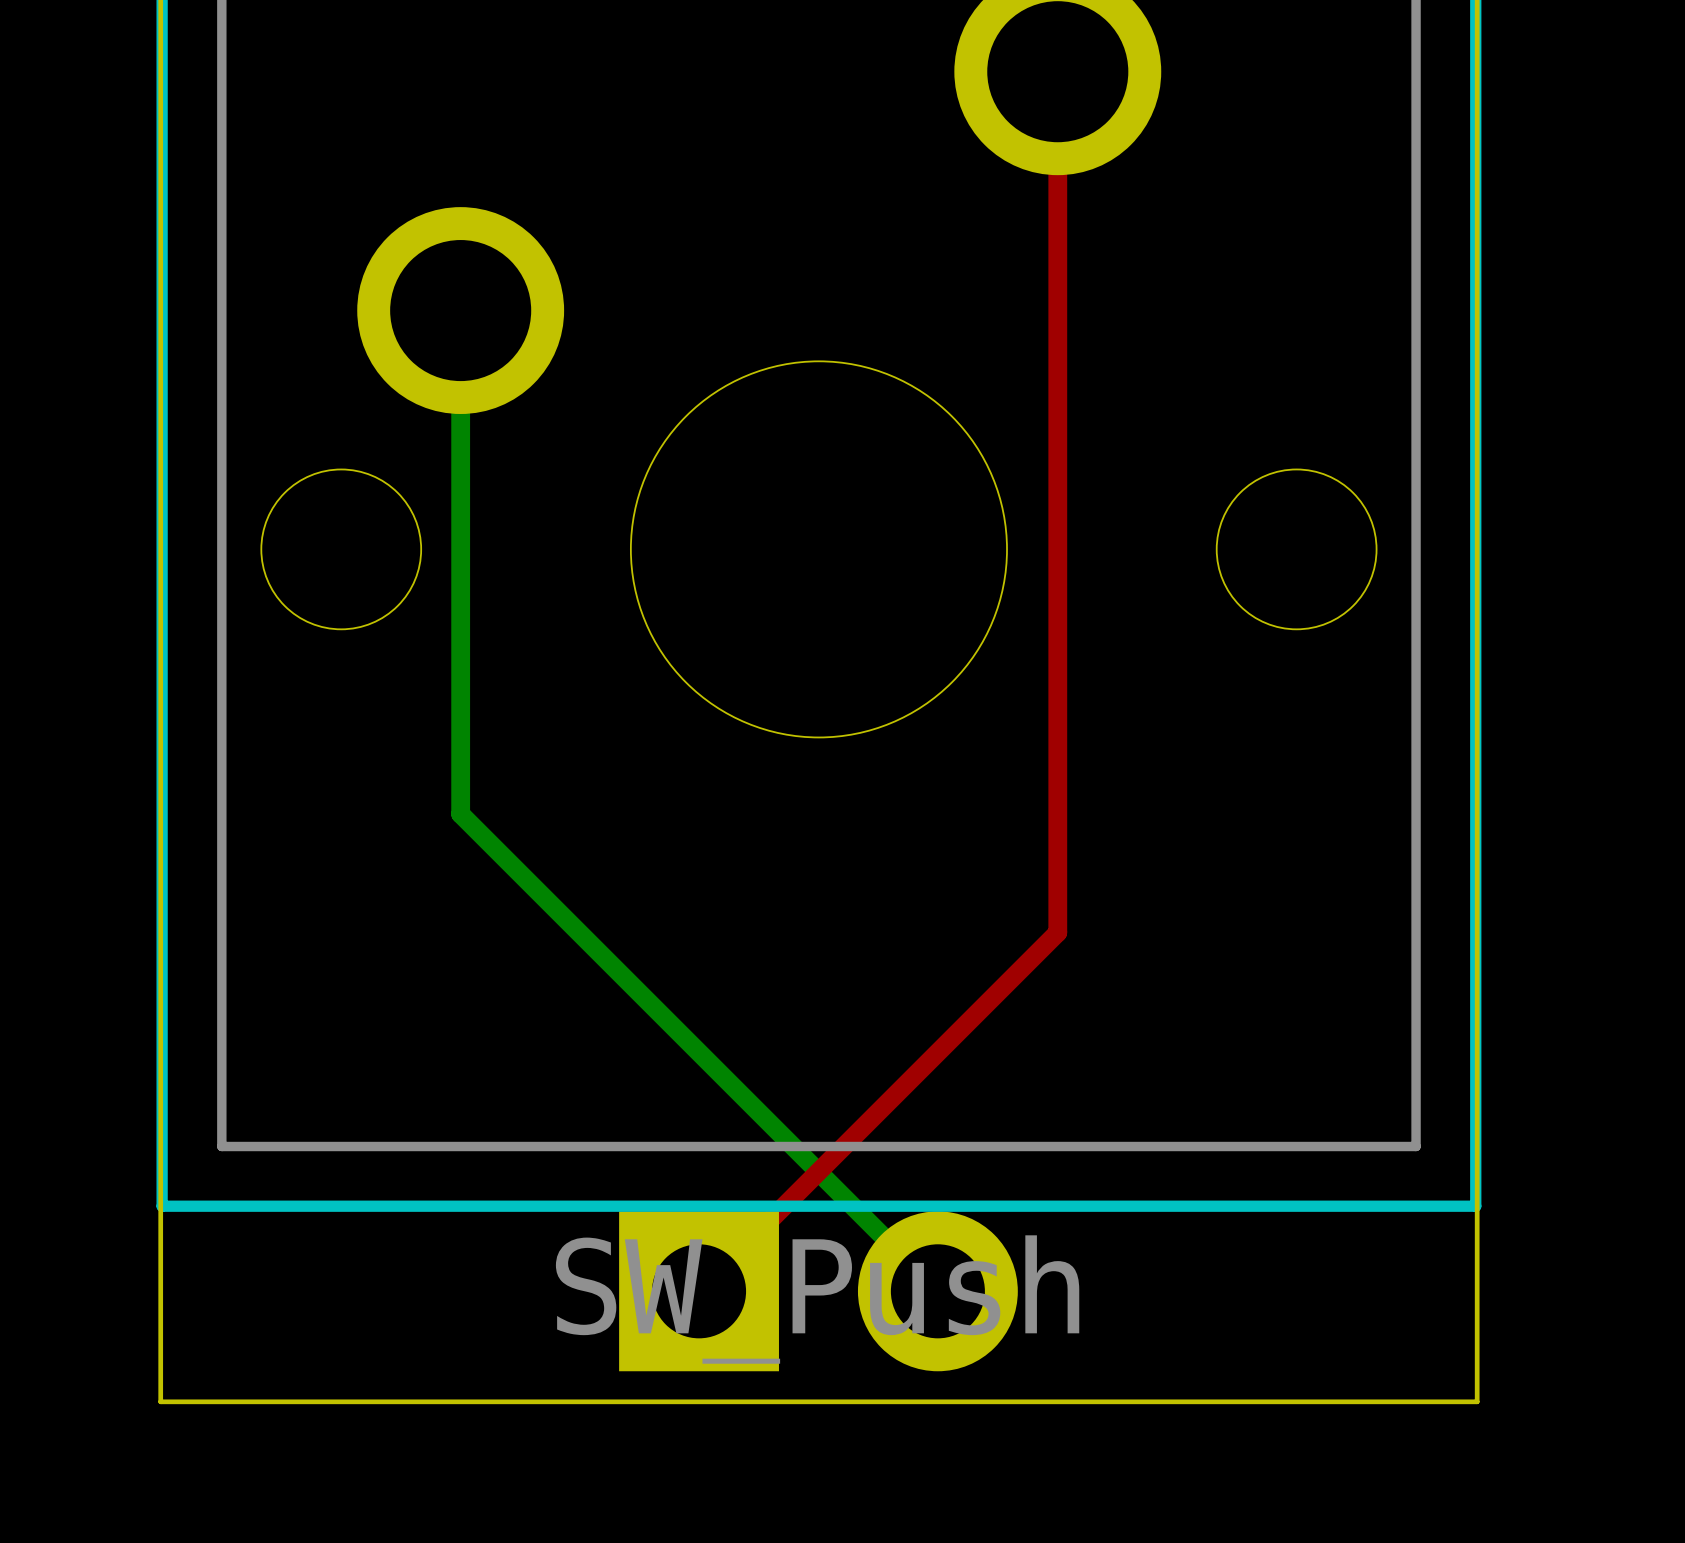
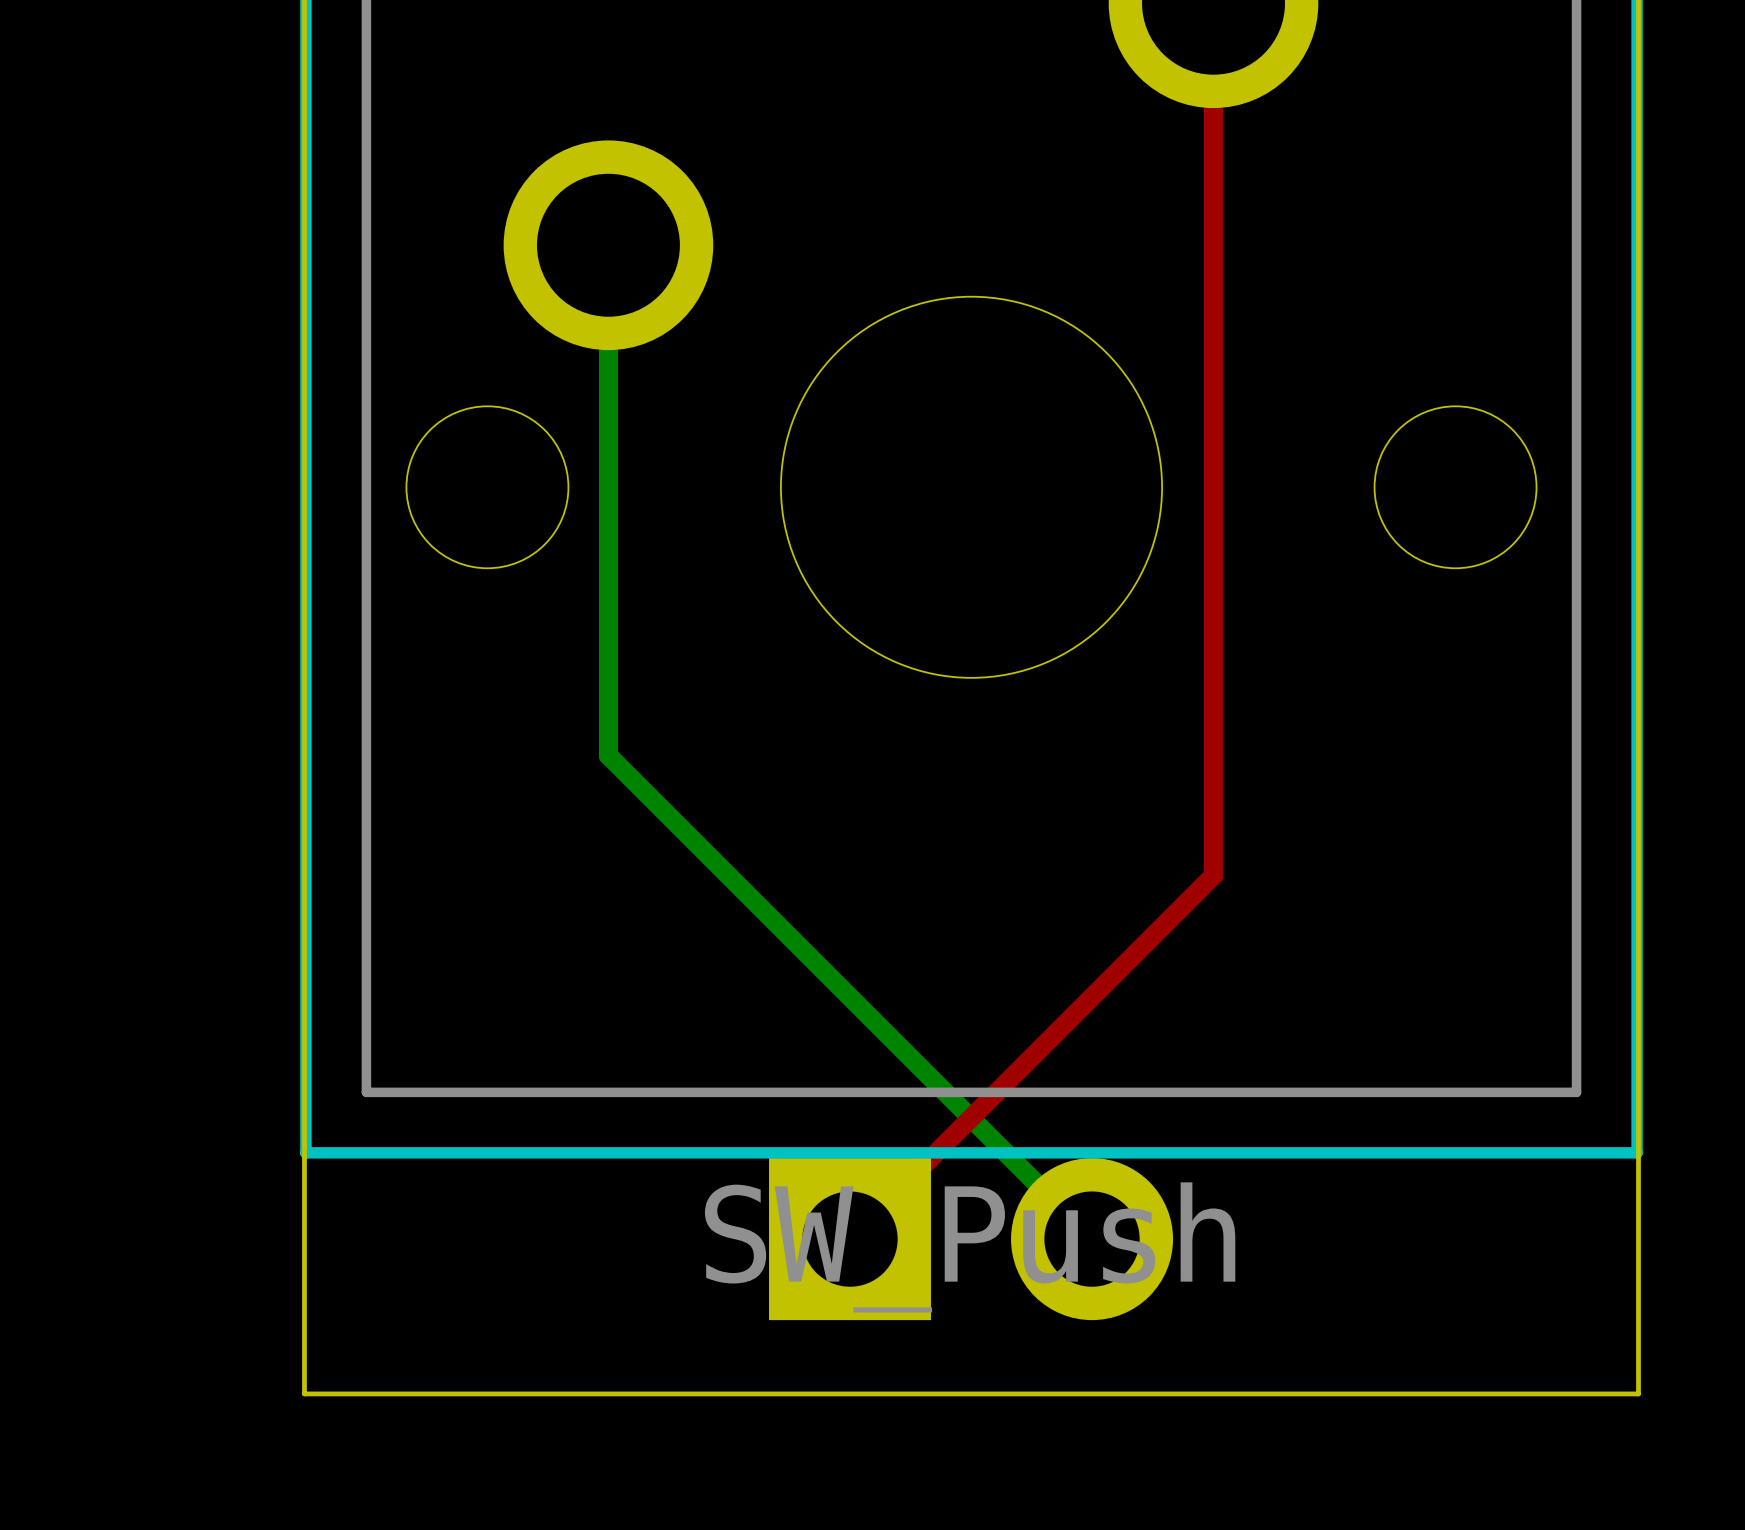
board edge: (160, 1401) (1477, 1401) -> (304, 1351) (304, 1393) (1638, 1393) (1638, 1351)

